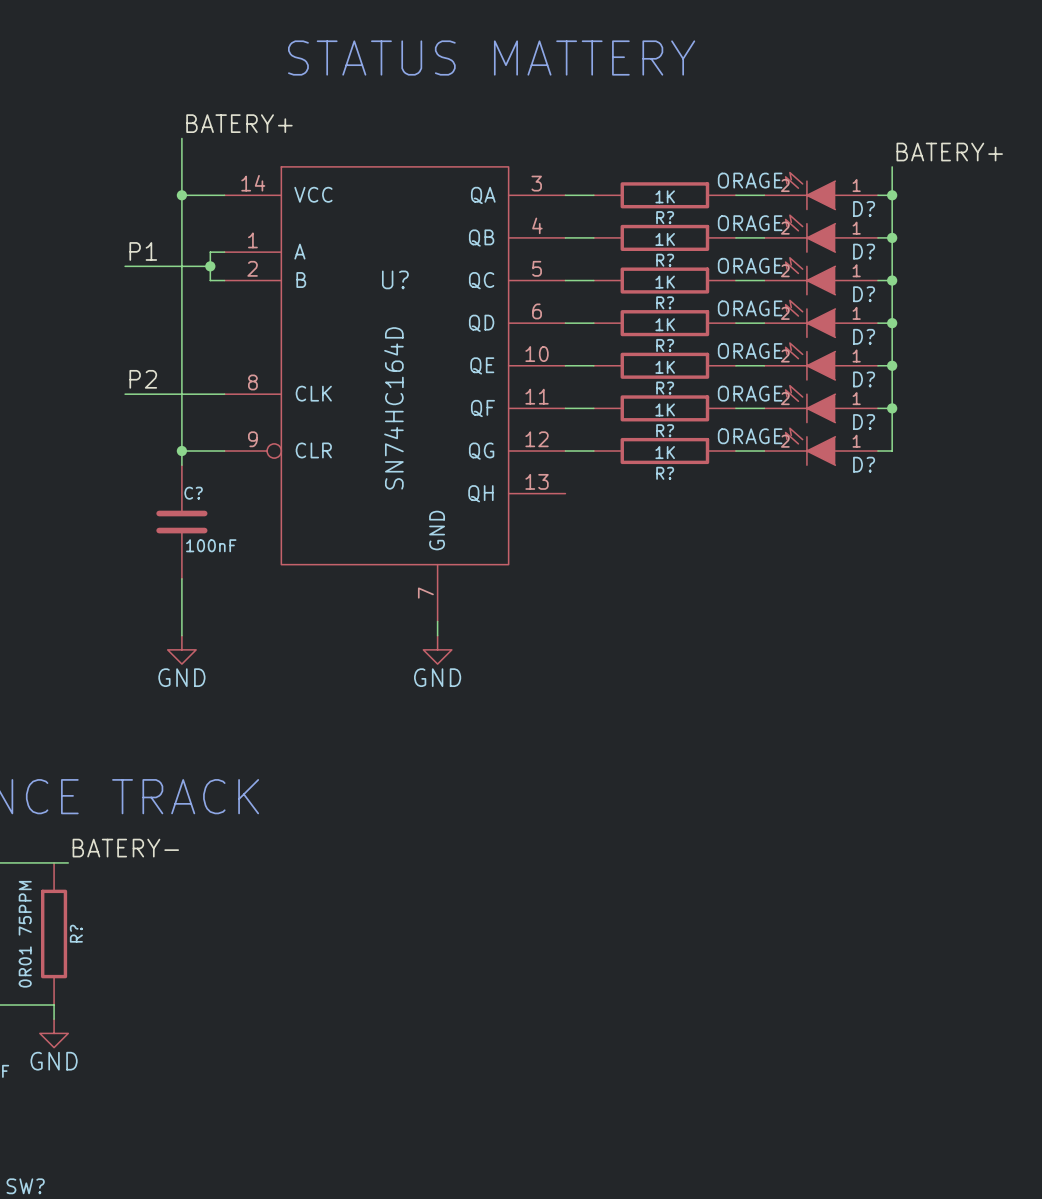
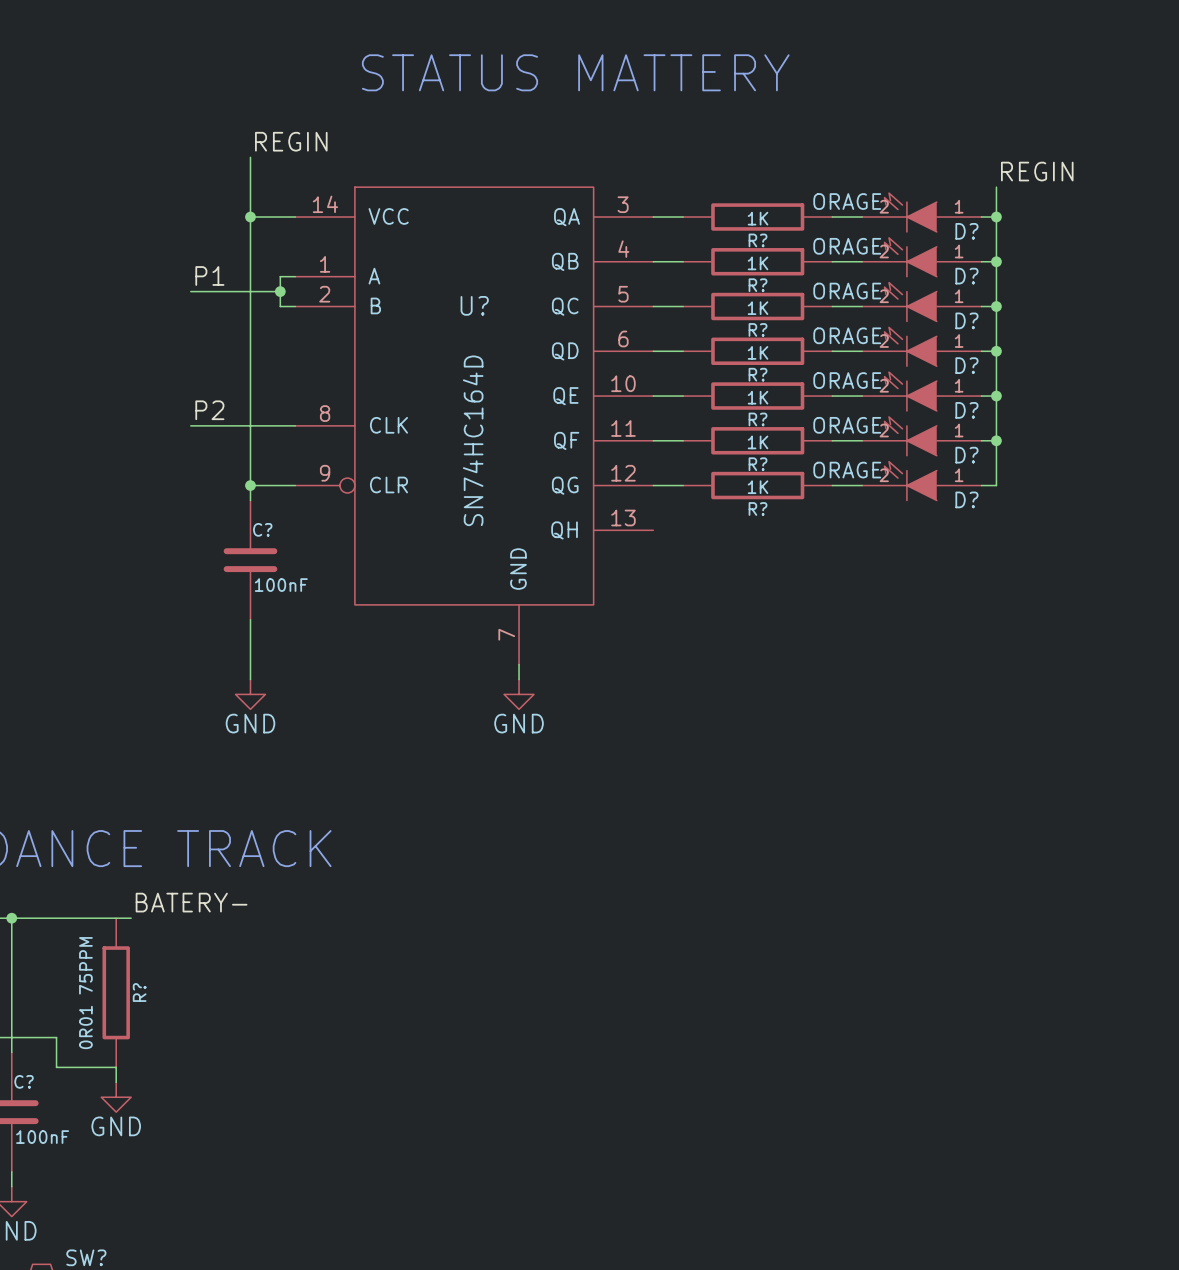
label: BATERY+ (239, 123) -> REGIN (291, 141)
label: BATERY+ (949, 152) -> REGIN (1037, 171)

